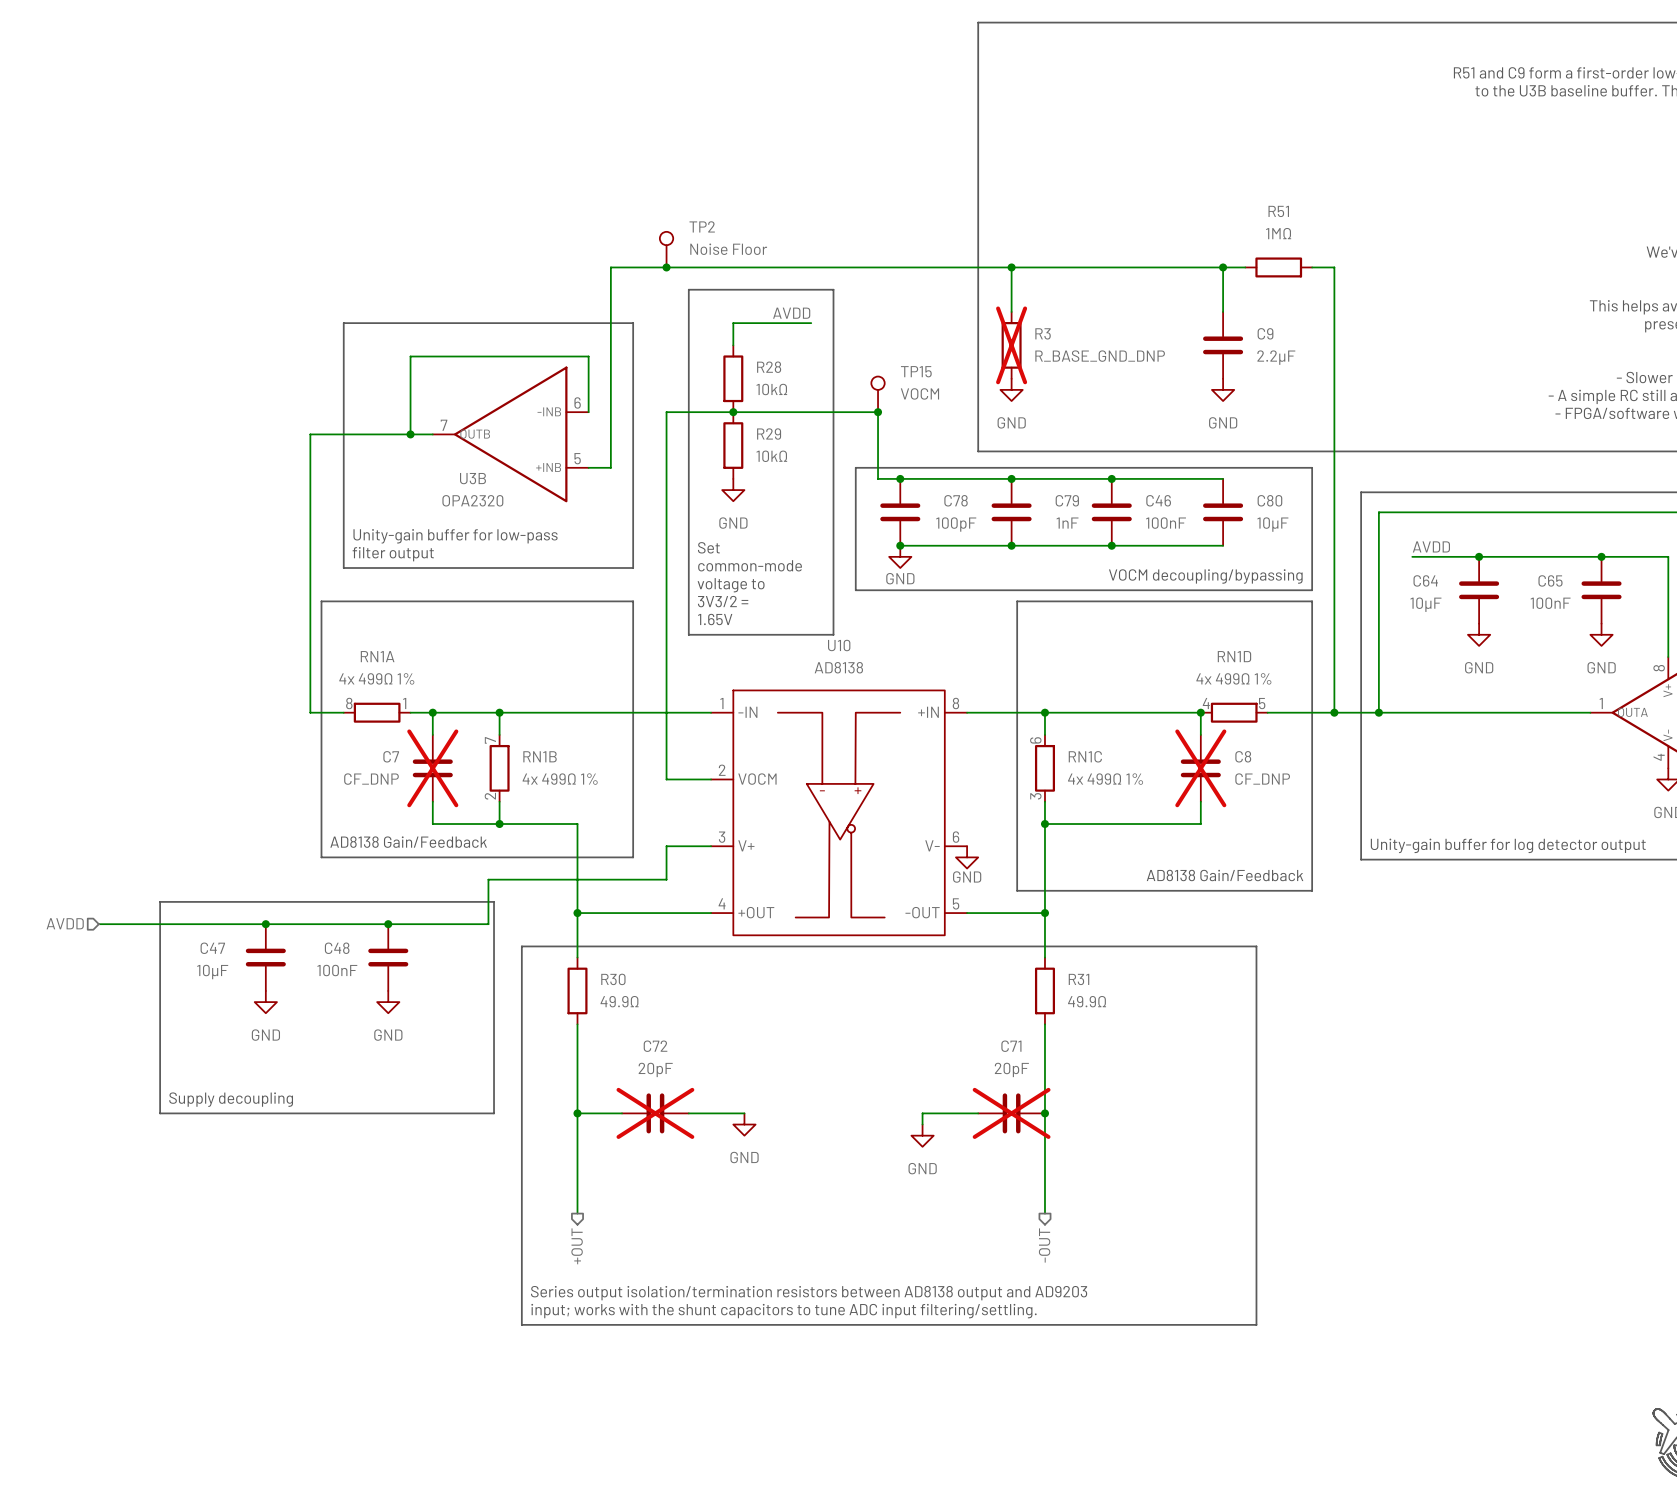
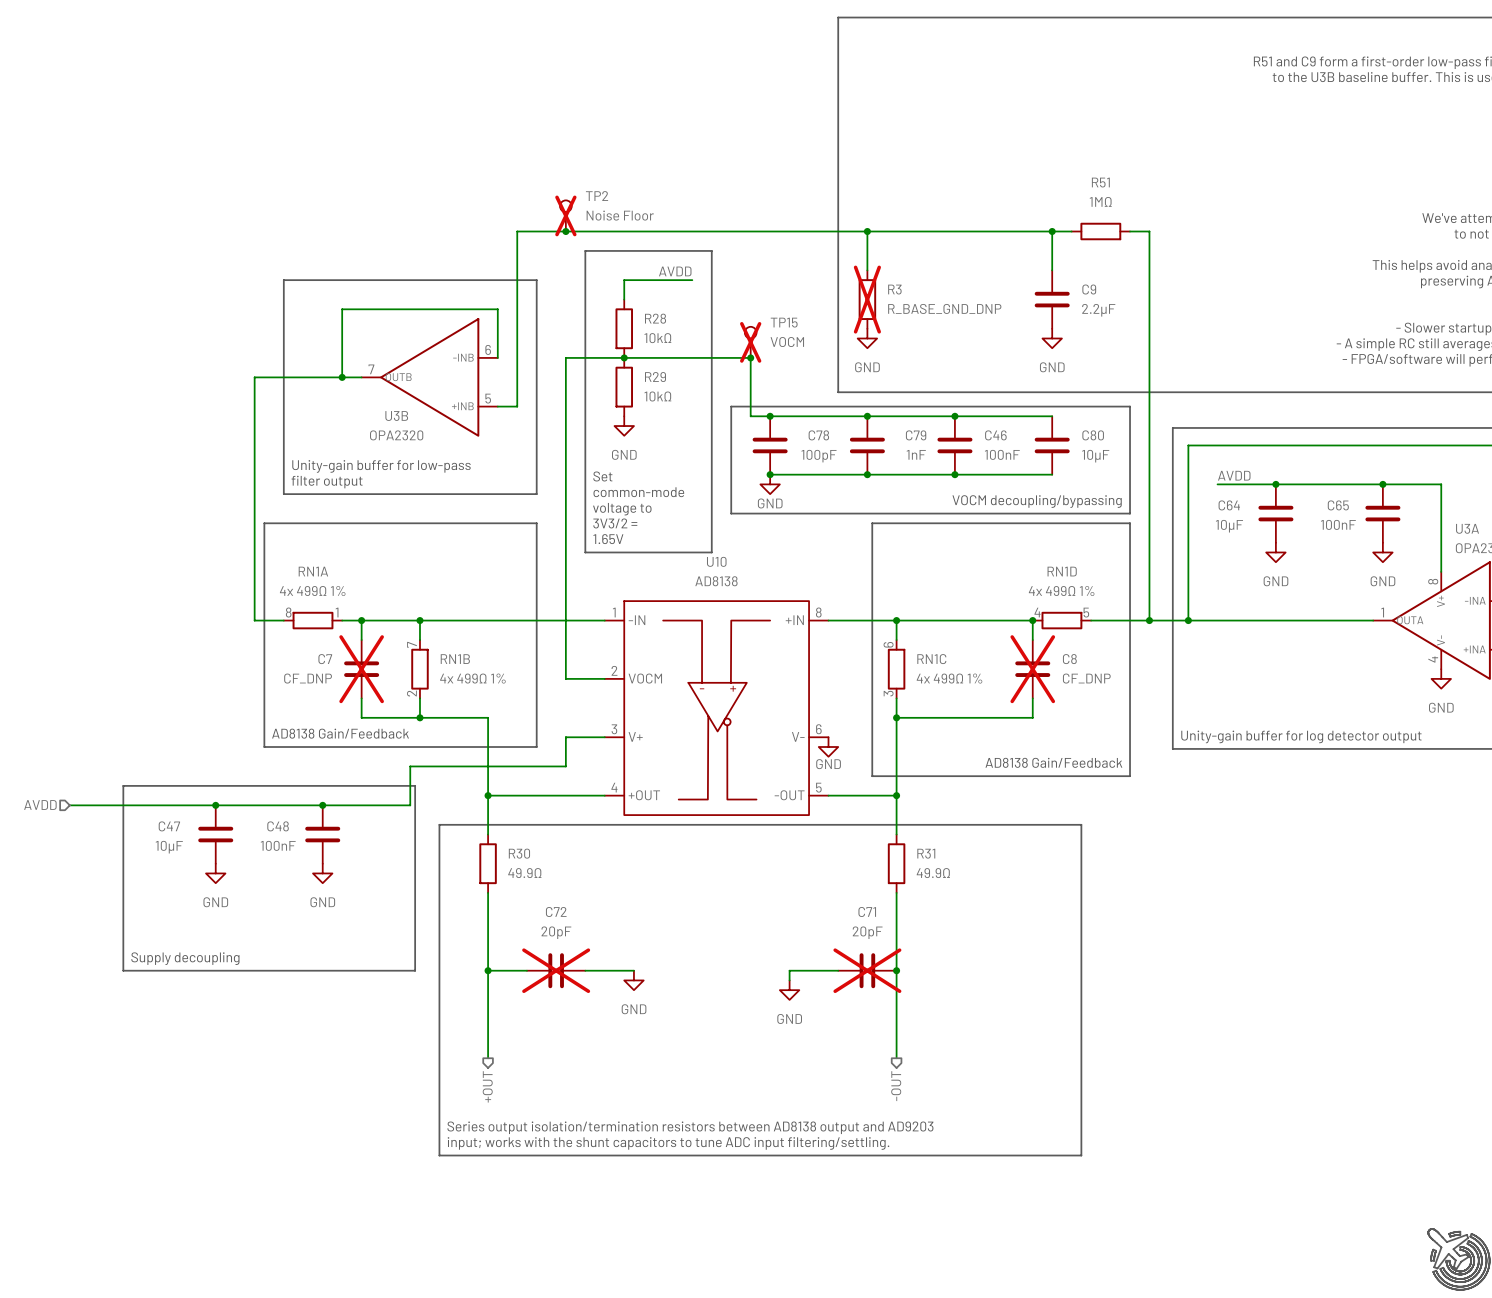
TP2 do-not-place cross: none -> (565, 215)
TP15 do-not-place cross: none -> (750, 342)

